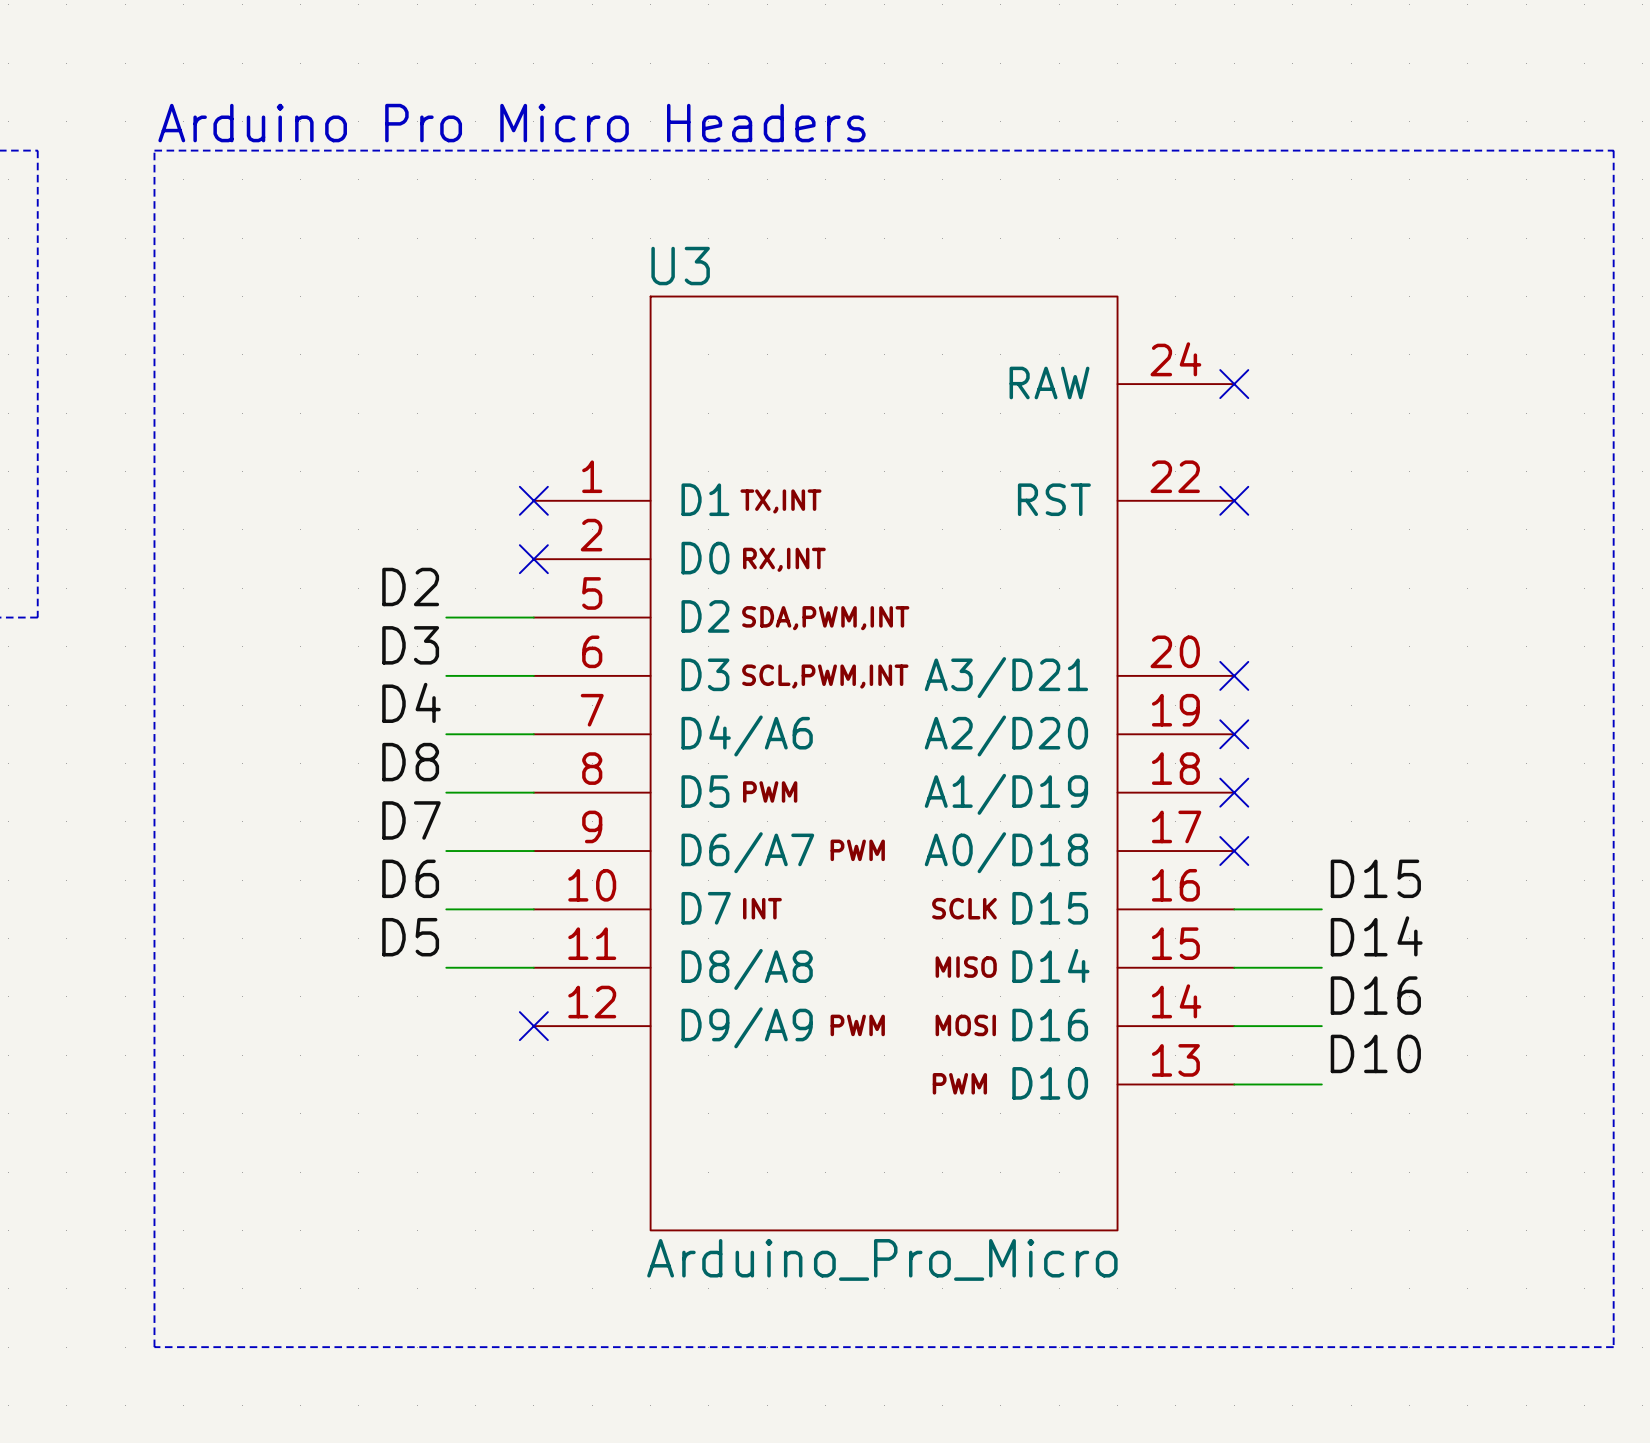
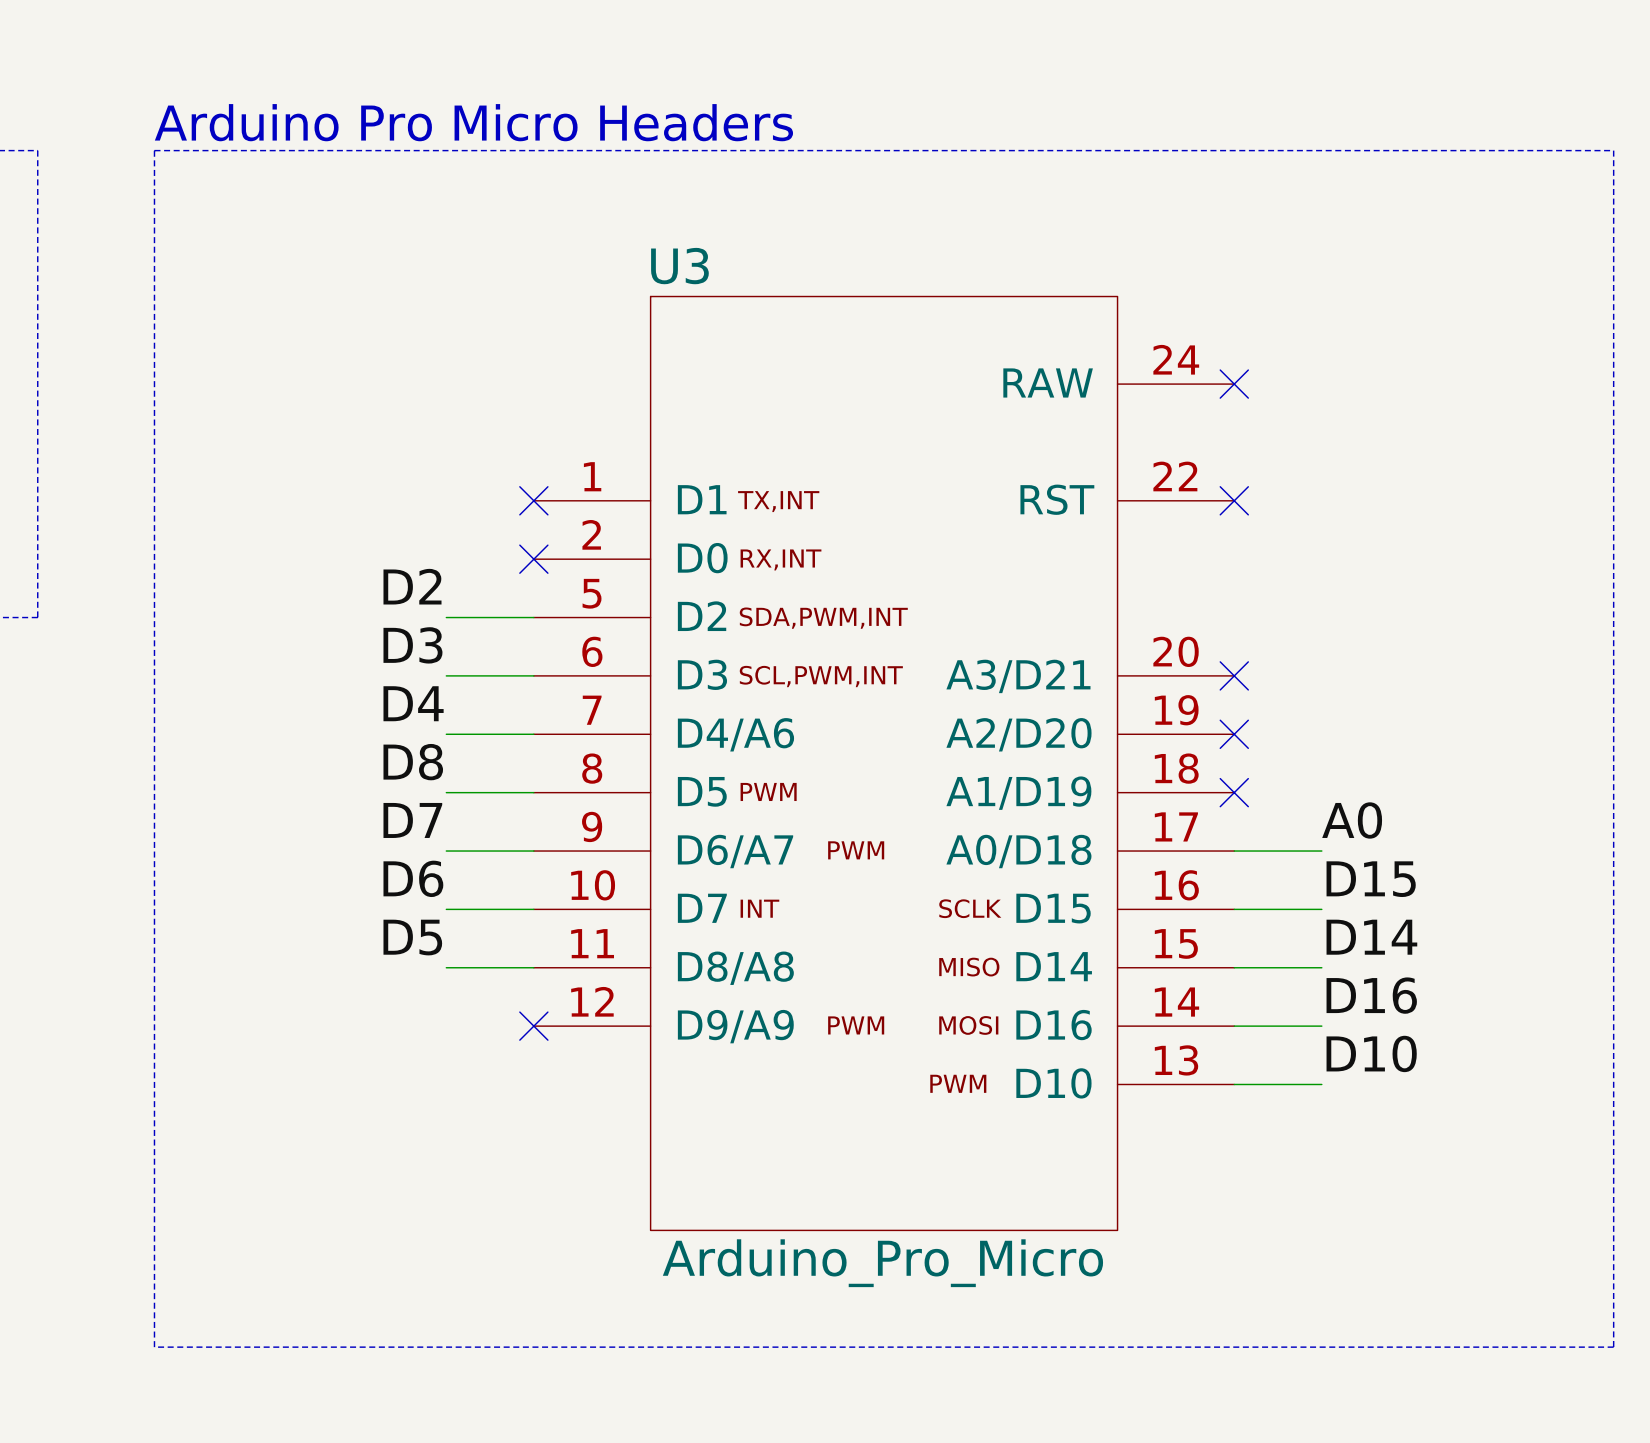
label: none -> A0 (1352, 820)
wire: none -> (1234, 851) (1321, 851)
no-connect mark: (1234, 851) -> none

